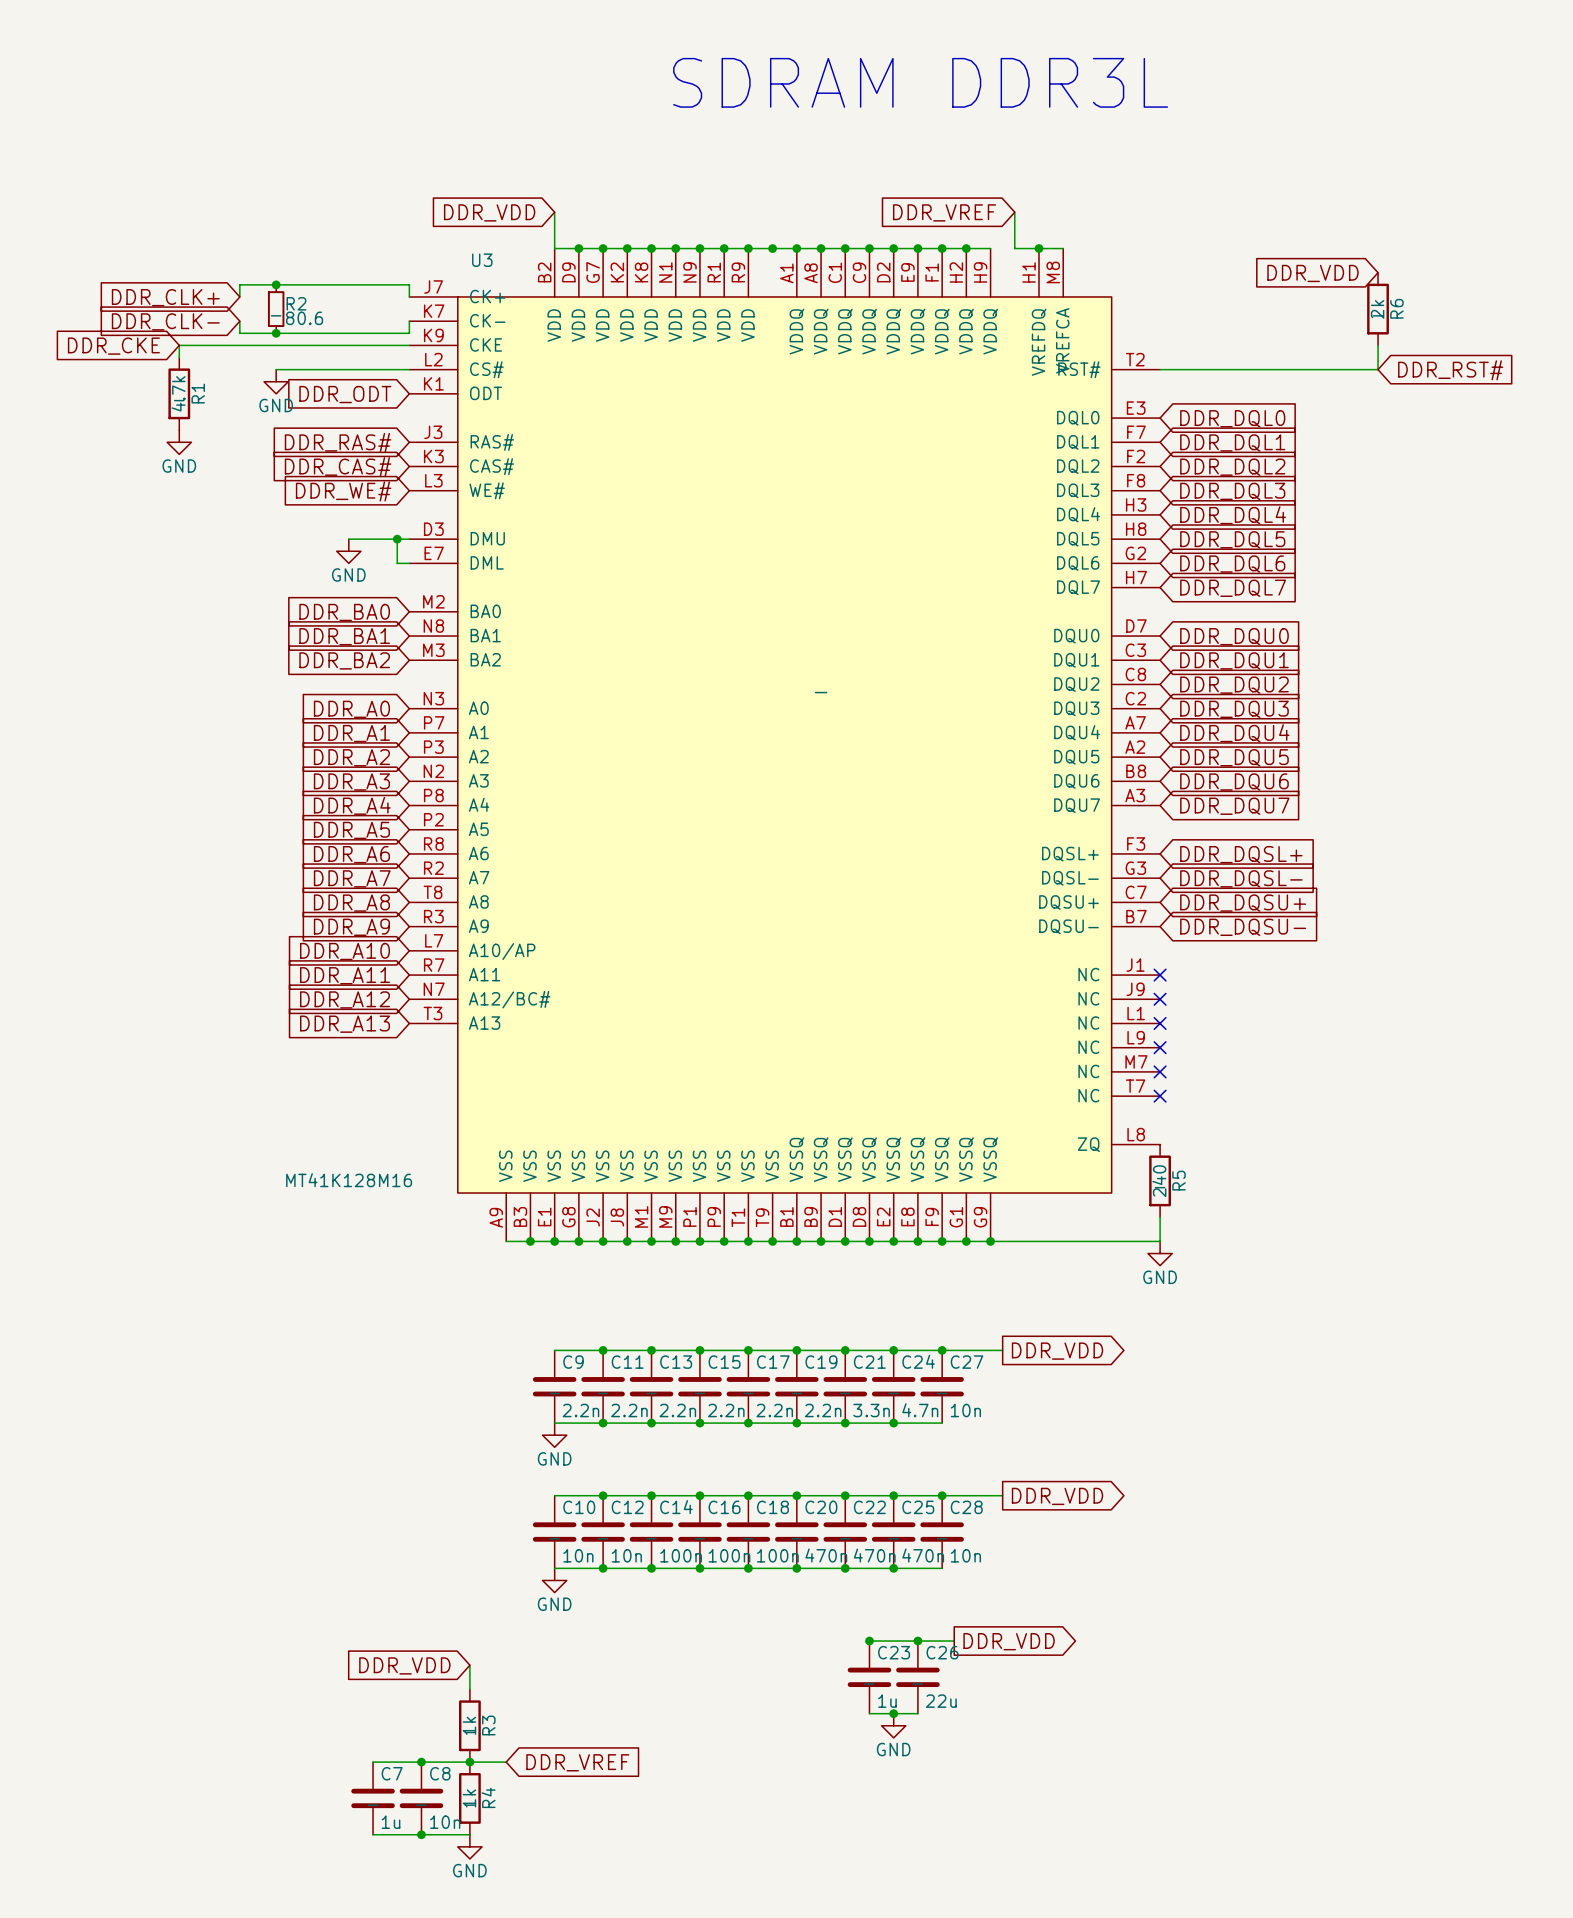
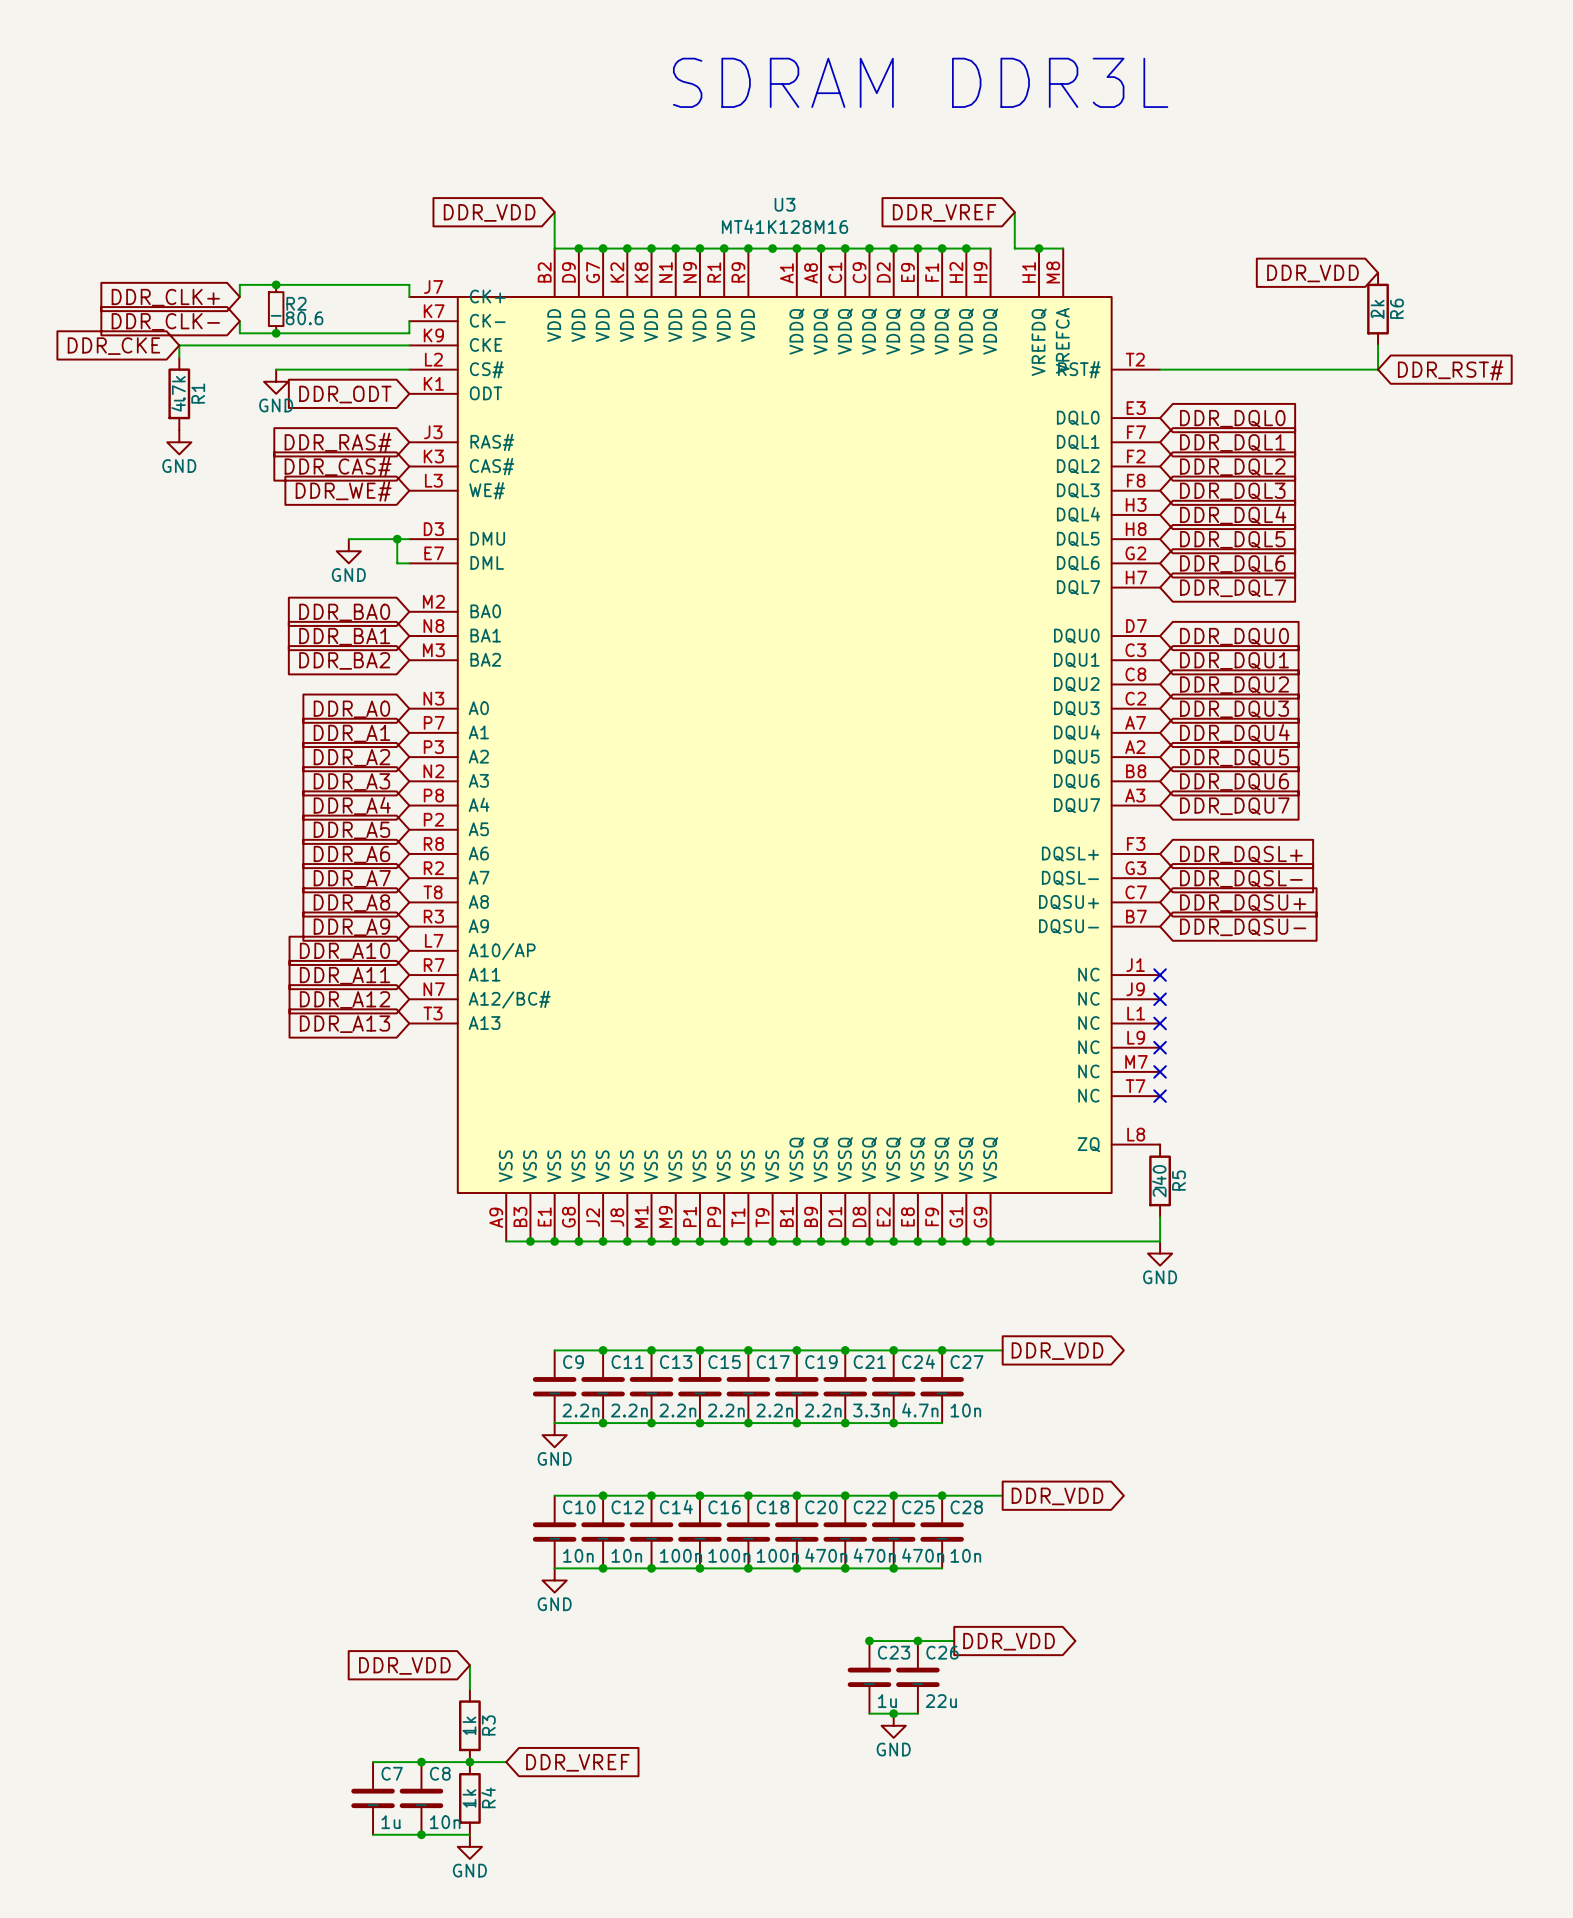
U3 name position: U3 (482, 260) -> U3 (785, 204)
U3 text: _ (821, 692) -> none
U3 value position: MT41K128M16 (349, 1180) -> MT41K128M16 (785, 226)

